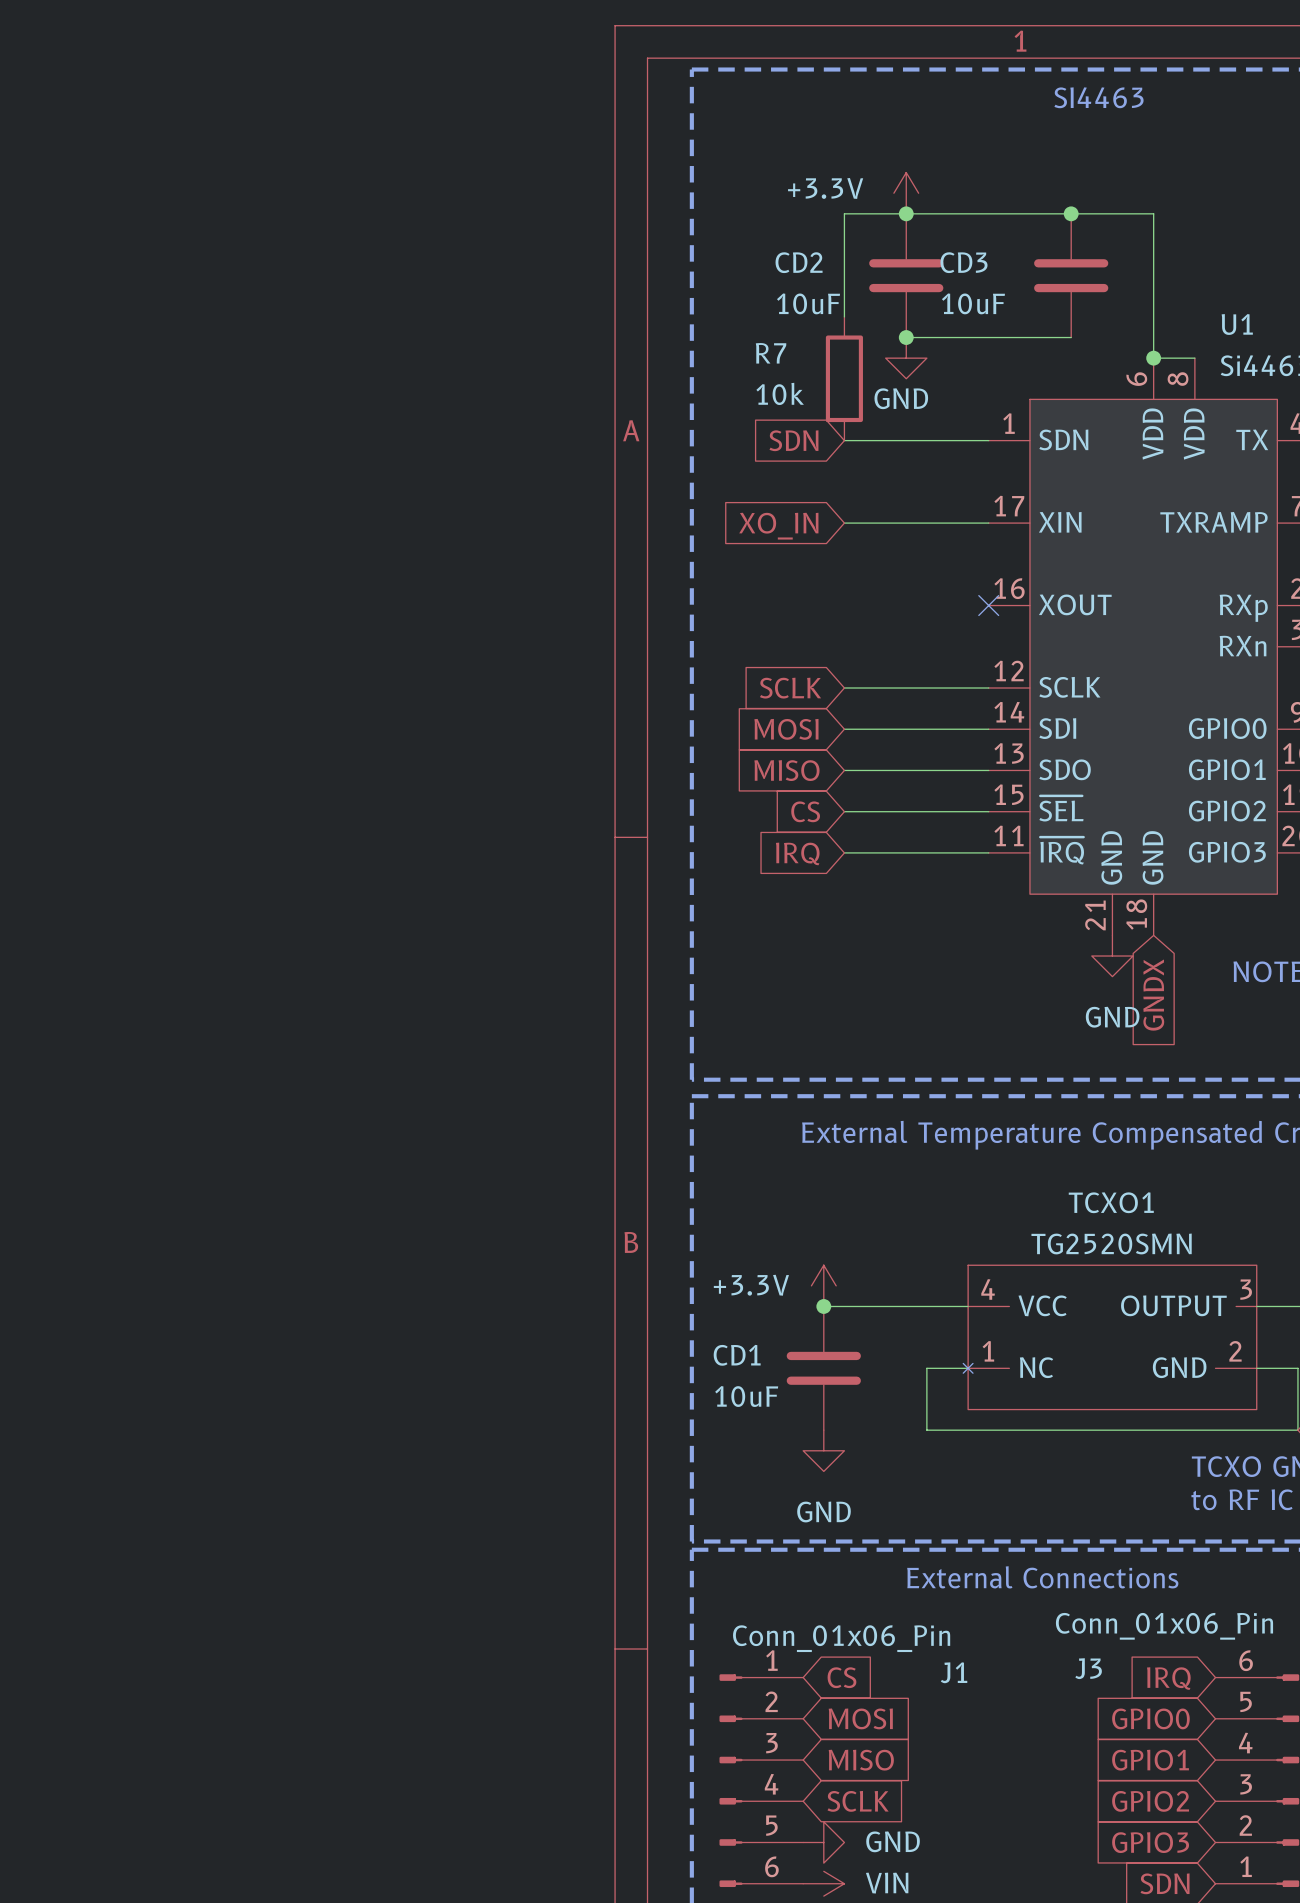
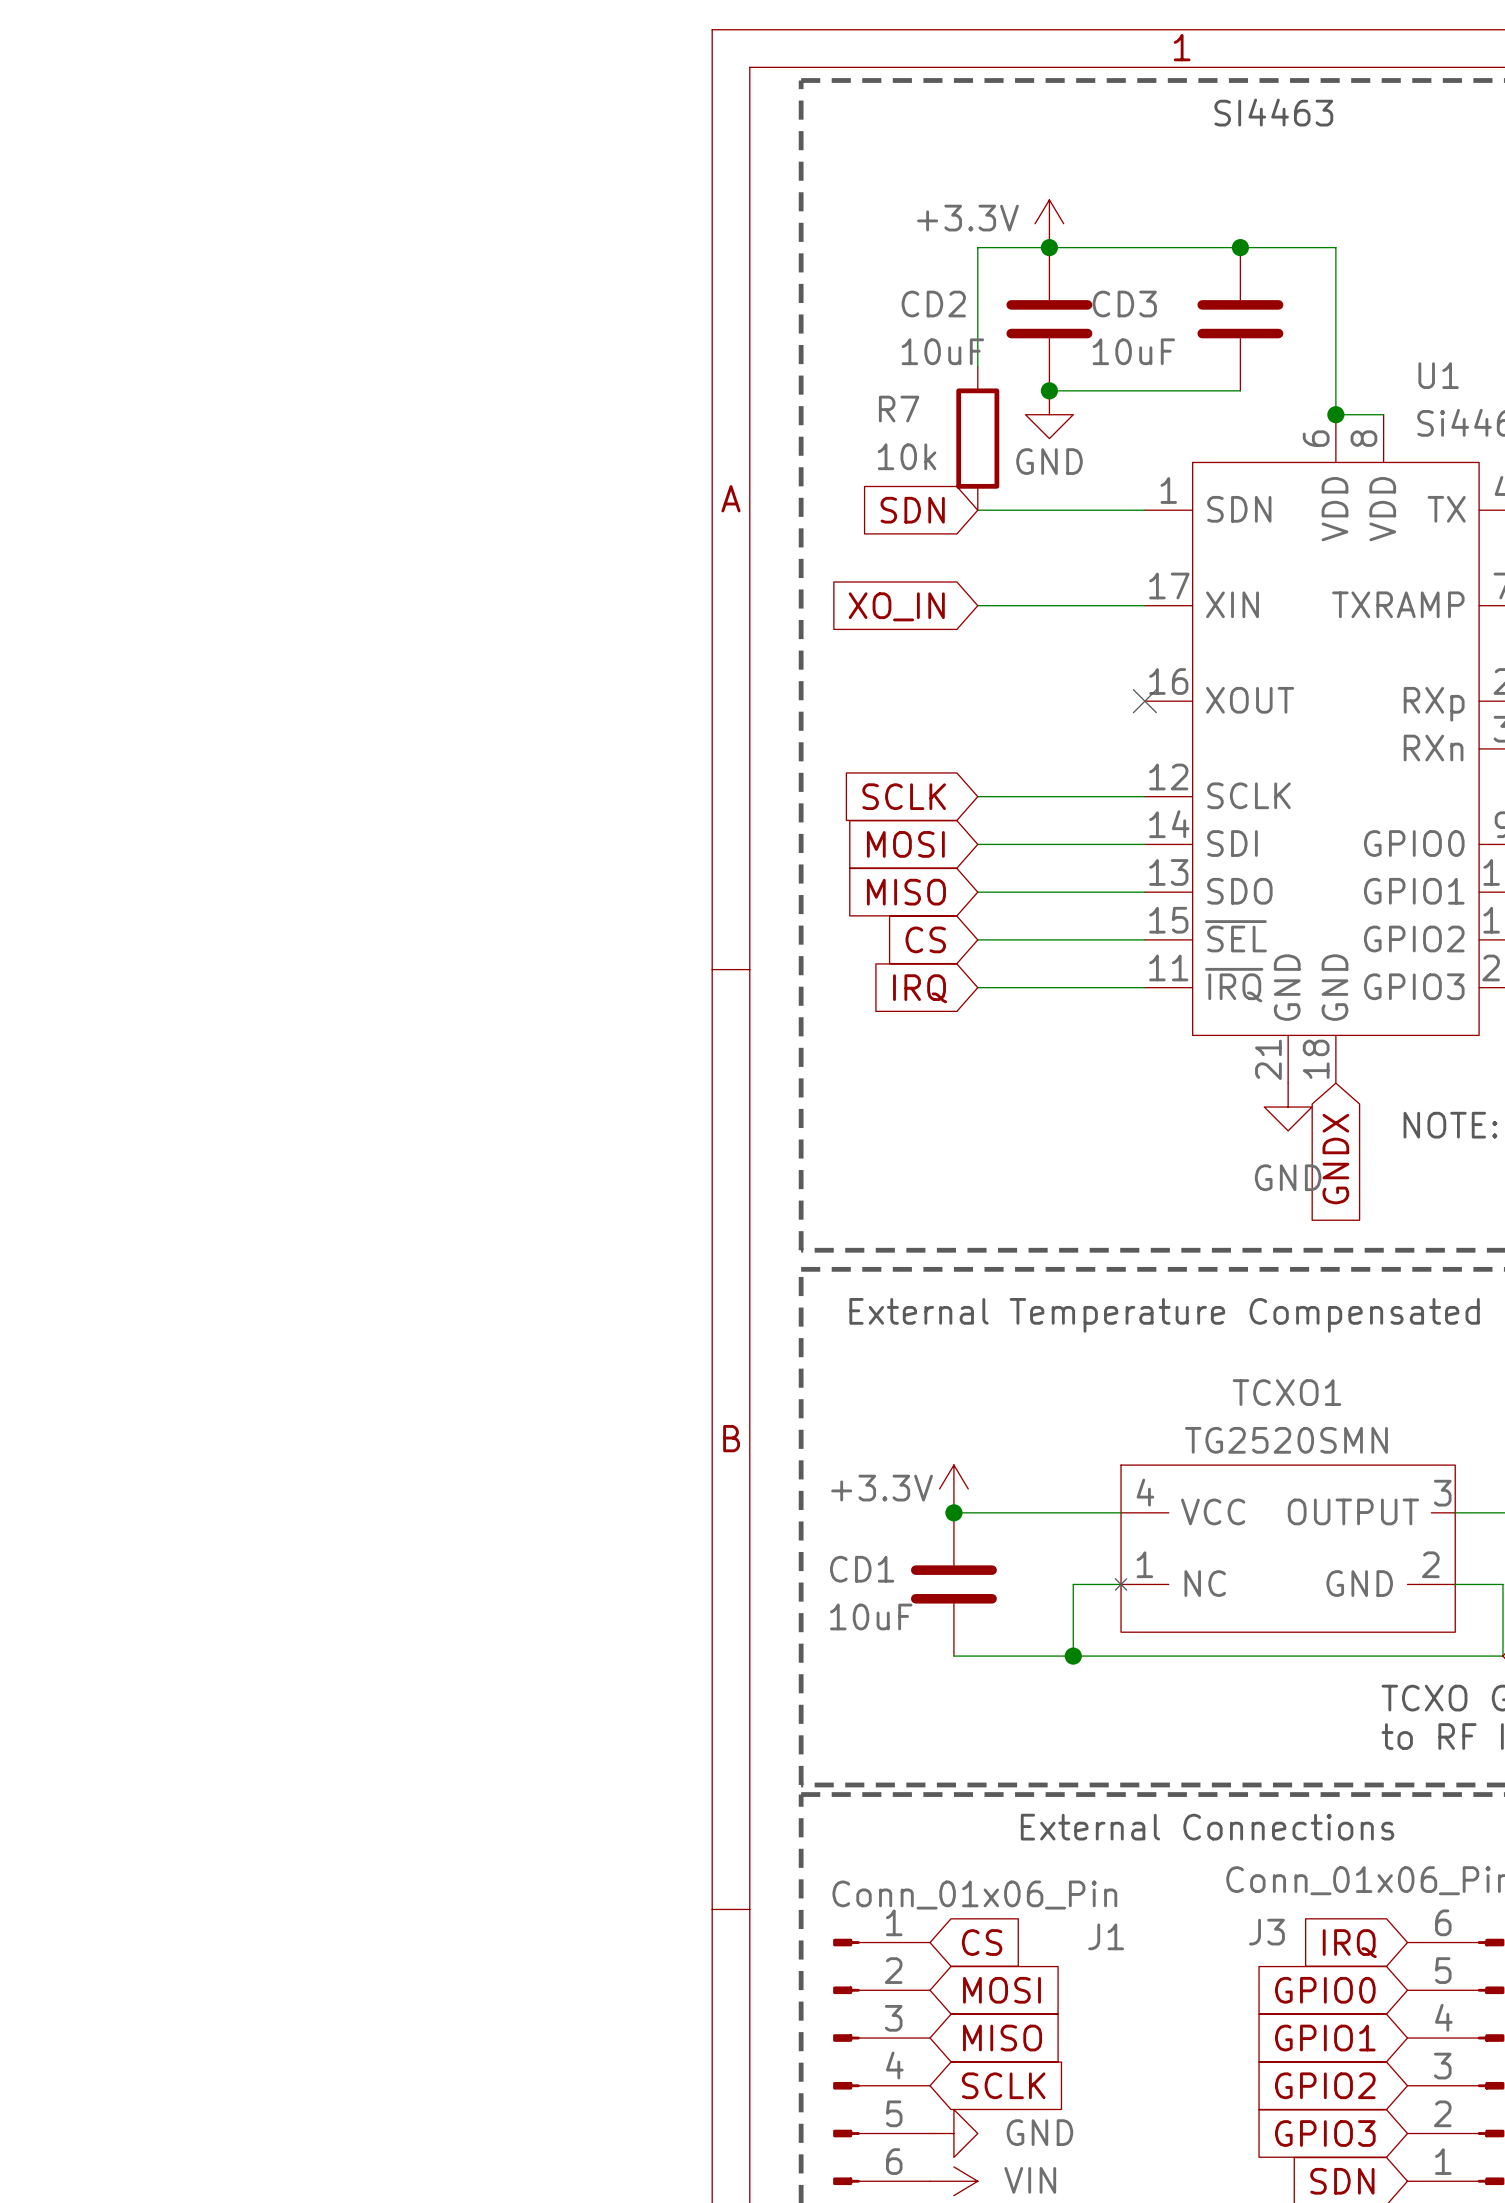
wire: none -> (953, 1656) (1073, 1656)
junction: none -> (1073, 1656)
power symbol: GND (823, 1450) -> none

